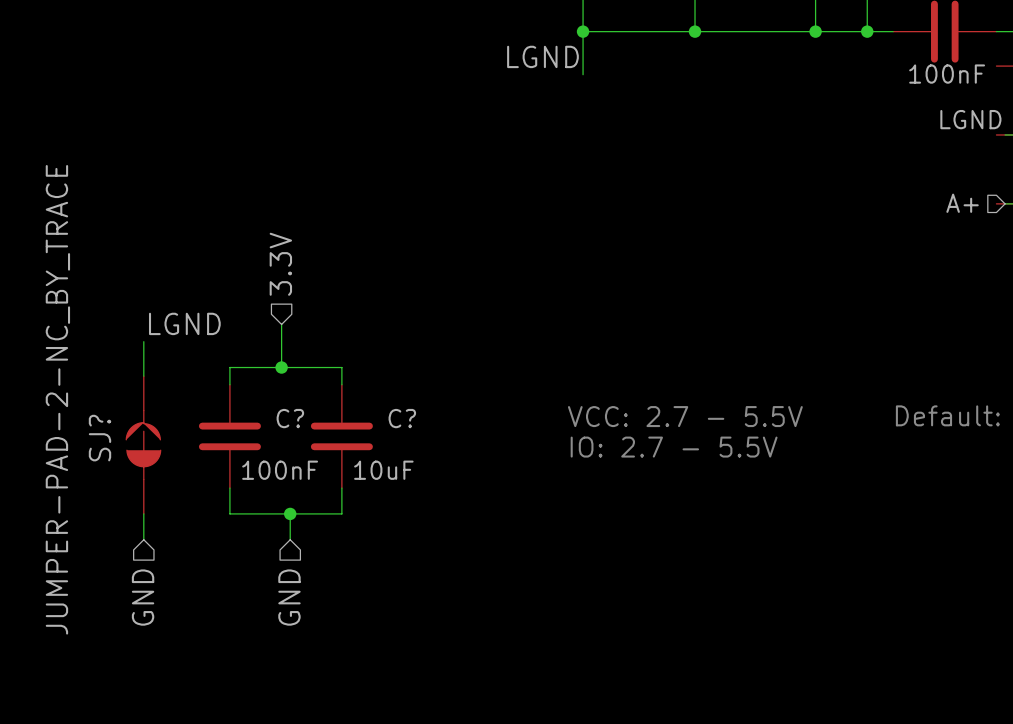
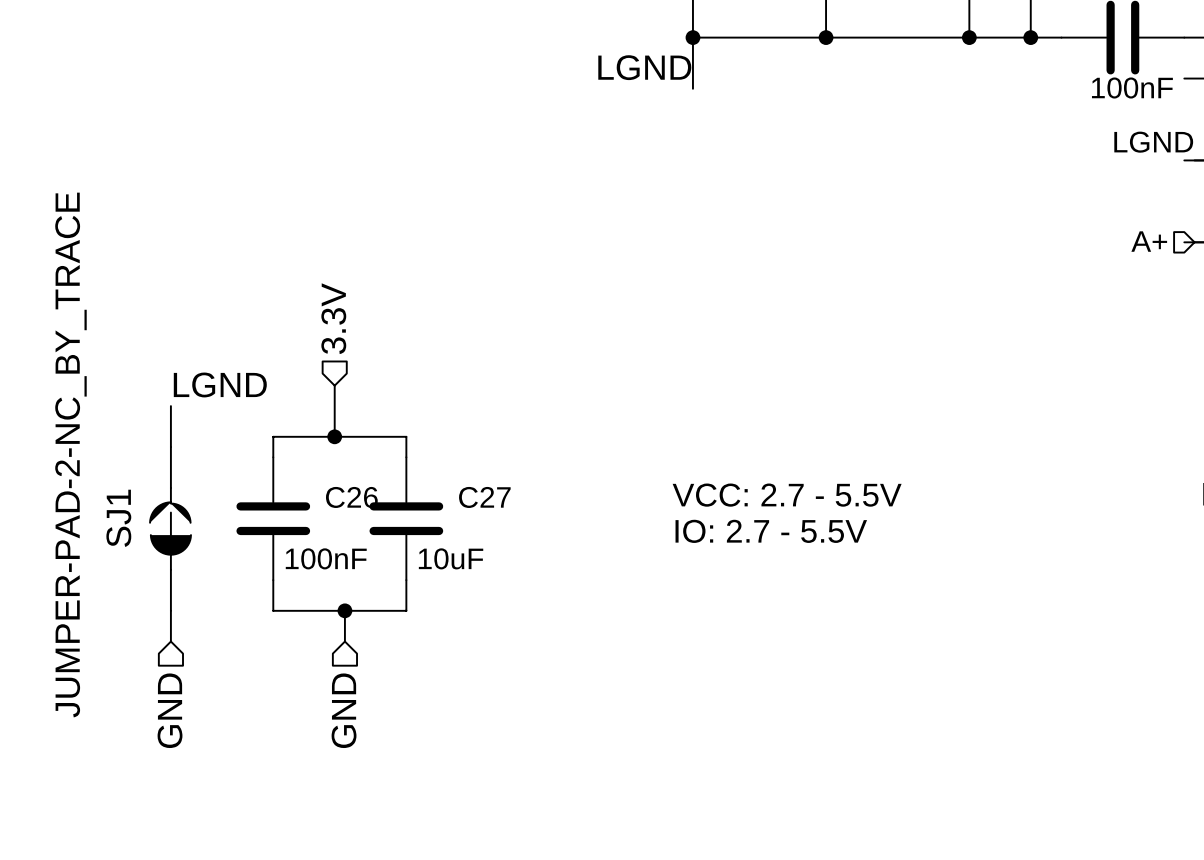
C? name: C? (290, 418) -> C26 (351, 497)
C? name: C? (402, 418) -> C27 (484, 497)
SJ? name: SJ? (99, 438) -> SJ1 (118, 518)

